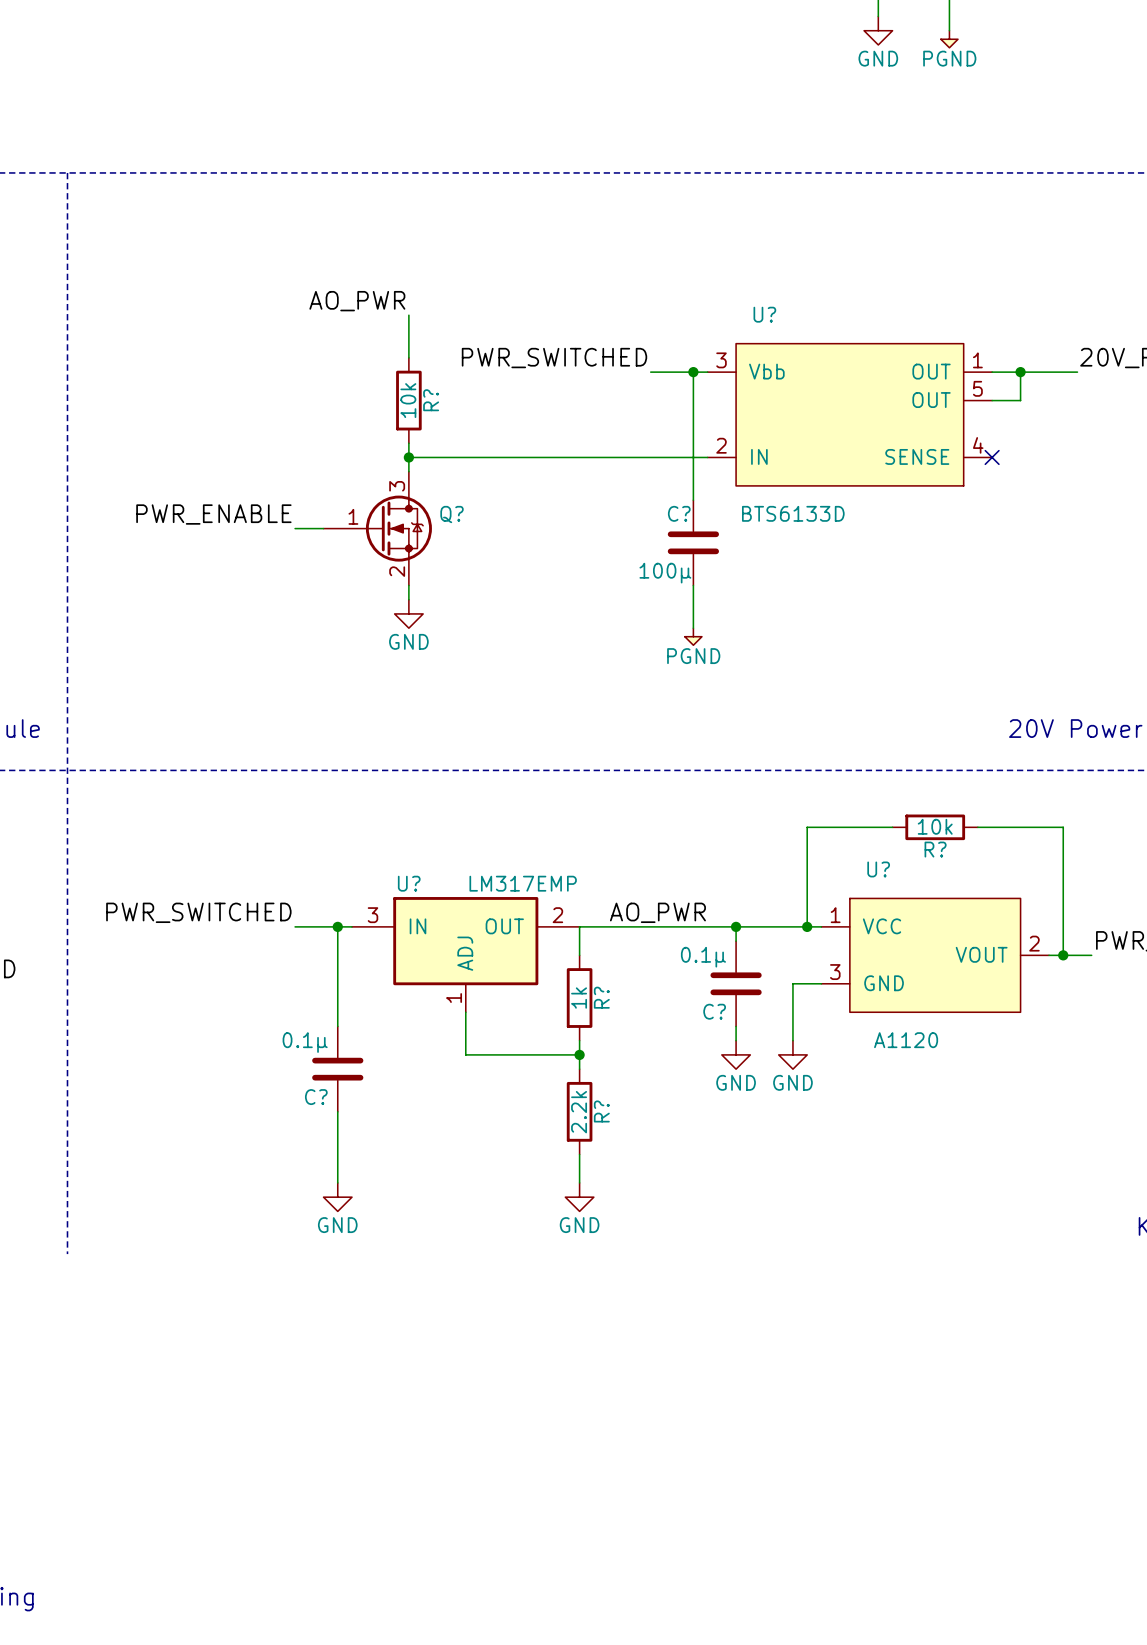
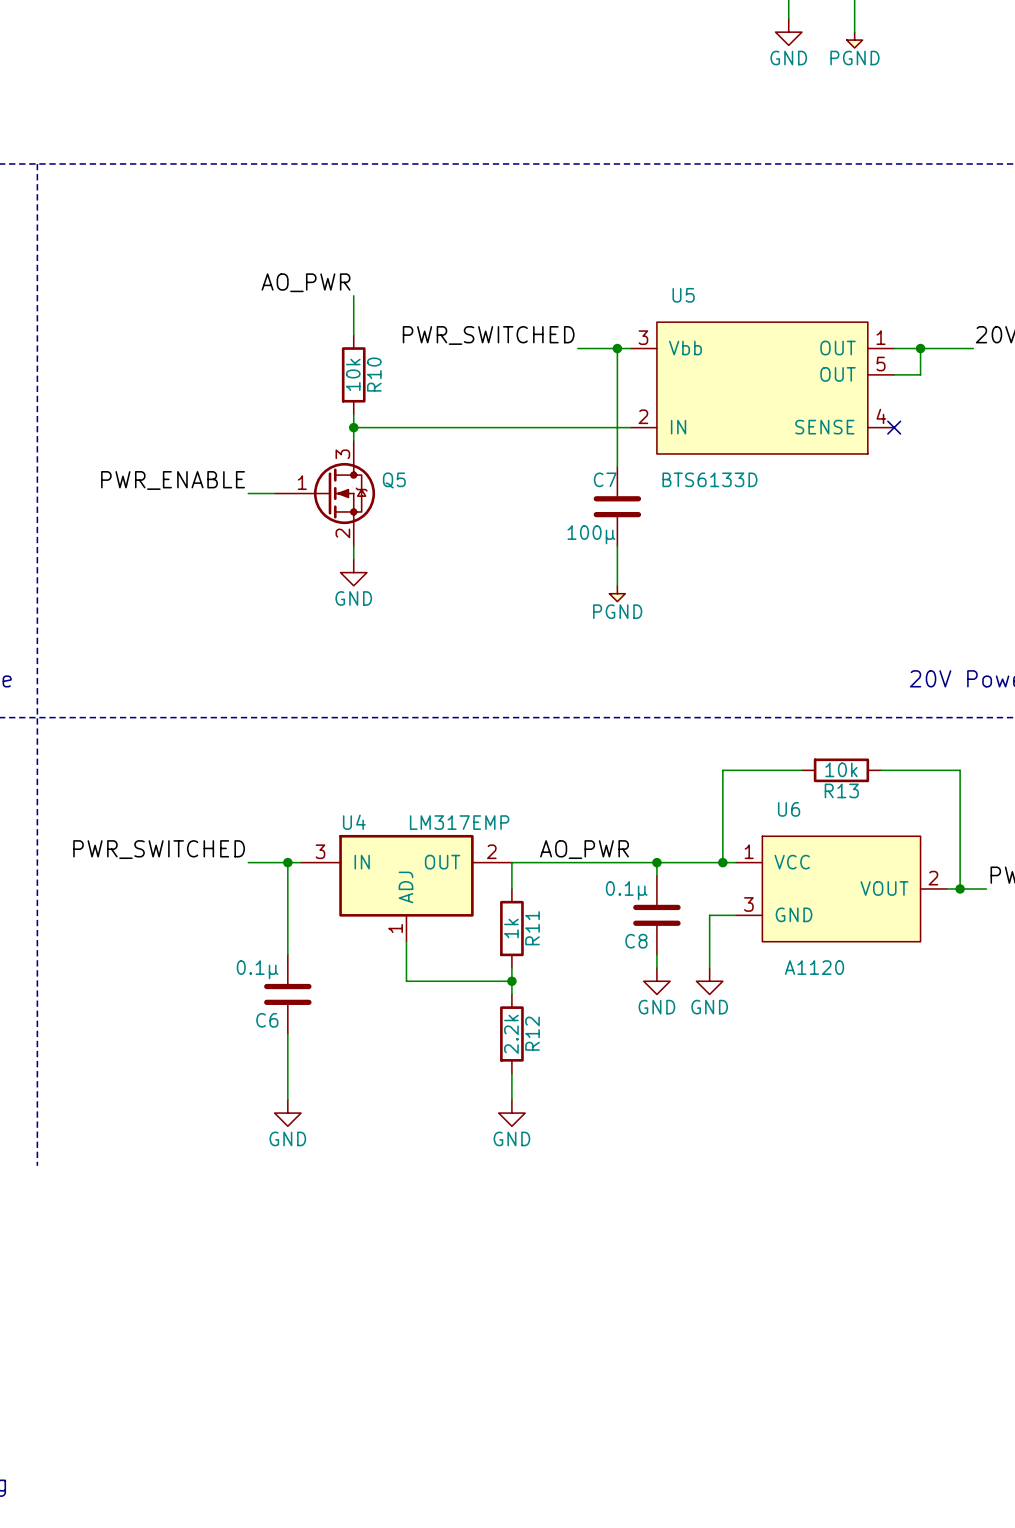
U? name: U? (764, 314) -> U5 (683, 295)
R? name: R? (431, 400) -> R10 (374, 374)
C? name: C? (679, 513) -> C7 (605, 479)
Q? name: Q? (452, 514) -> Q5 (394, 480)
R? name: R? (935, 849) -> R13 (841, 790)
U? name: U? (878, 869) -> U6 (789, 809)
U? name: U? (409, 883) -> U4 (354, 822)
R? name: R? (601, 997) -> R11 (532, 928)
C? name: C? (714, 1011) -> C8 (636, 941)
C? name: C? (316, 1097) -> C6 (267, 1020)
R? name: R? (601, 1111) -> R12 (532, 1033)

